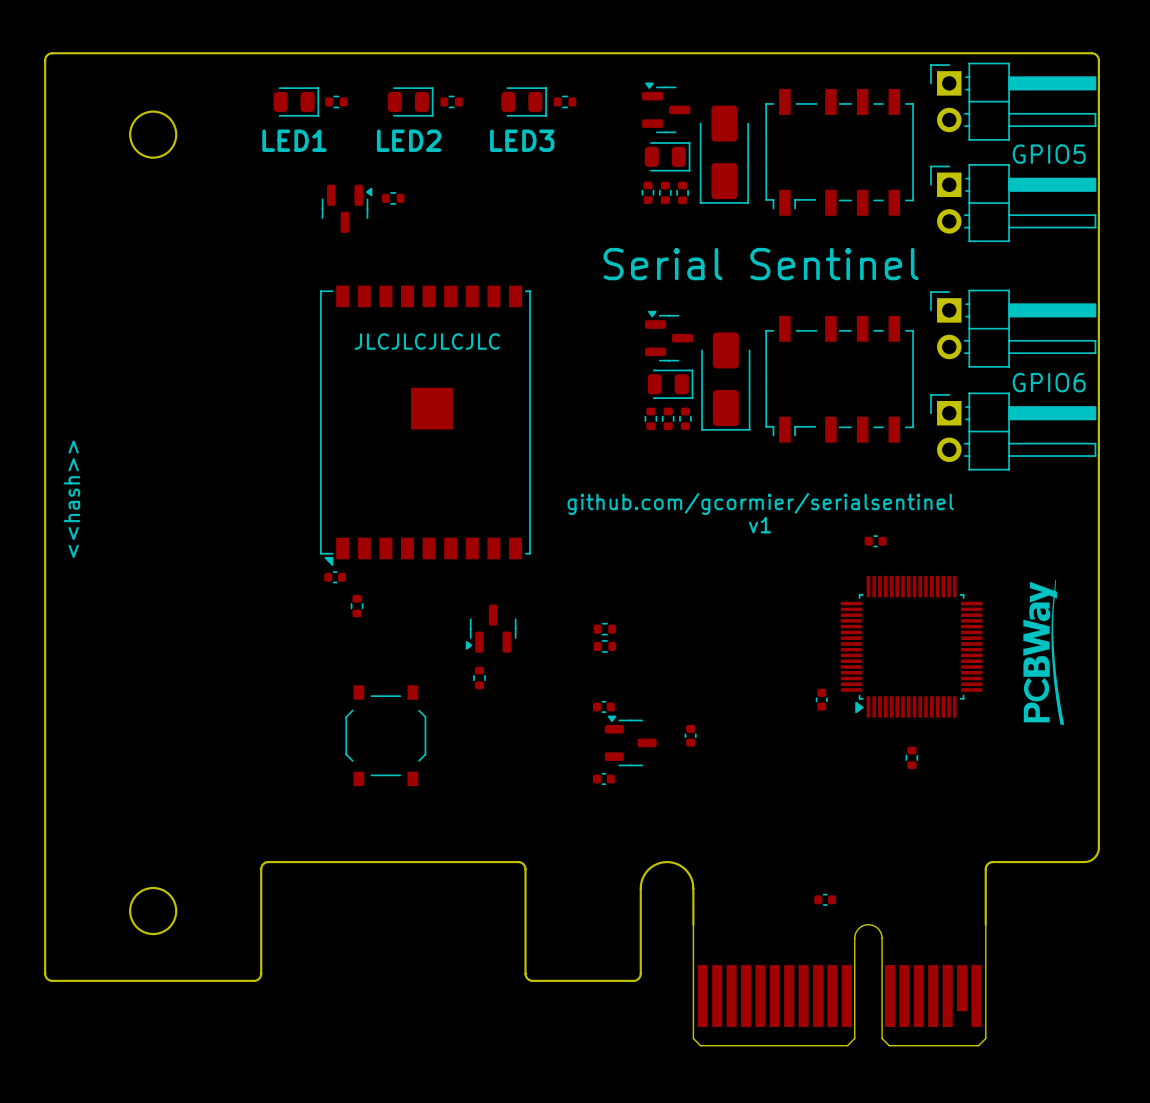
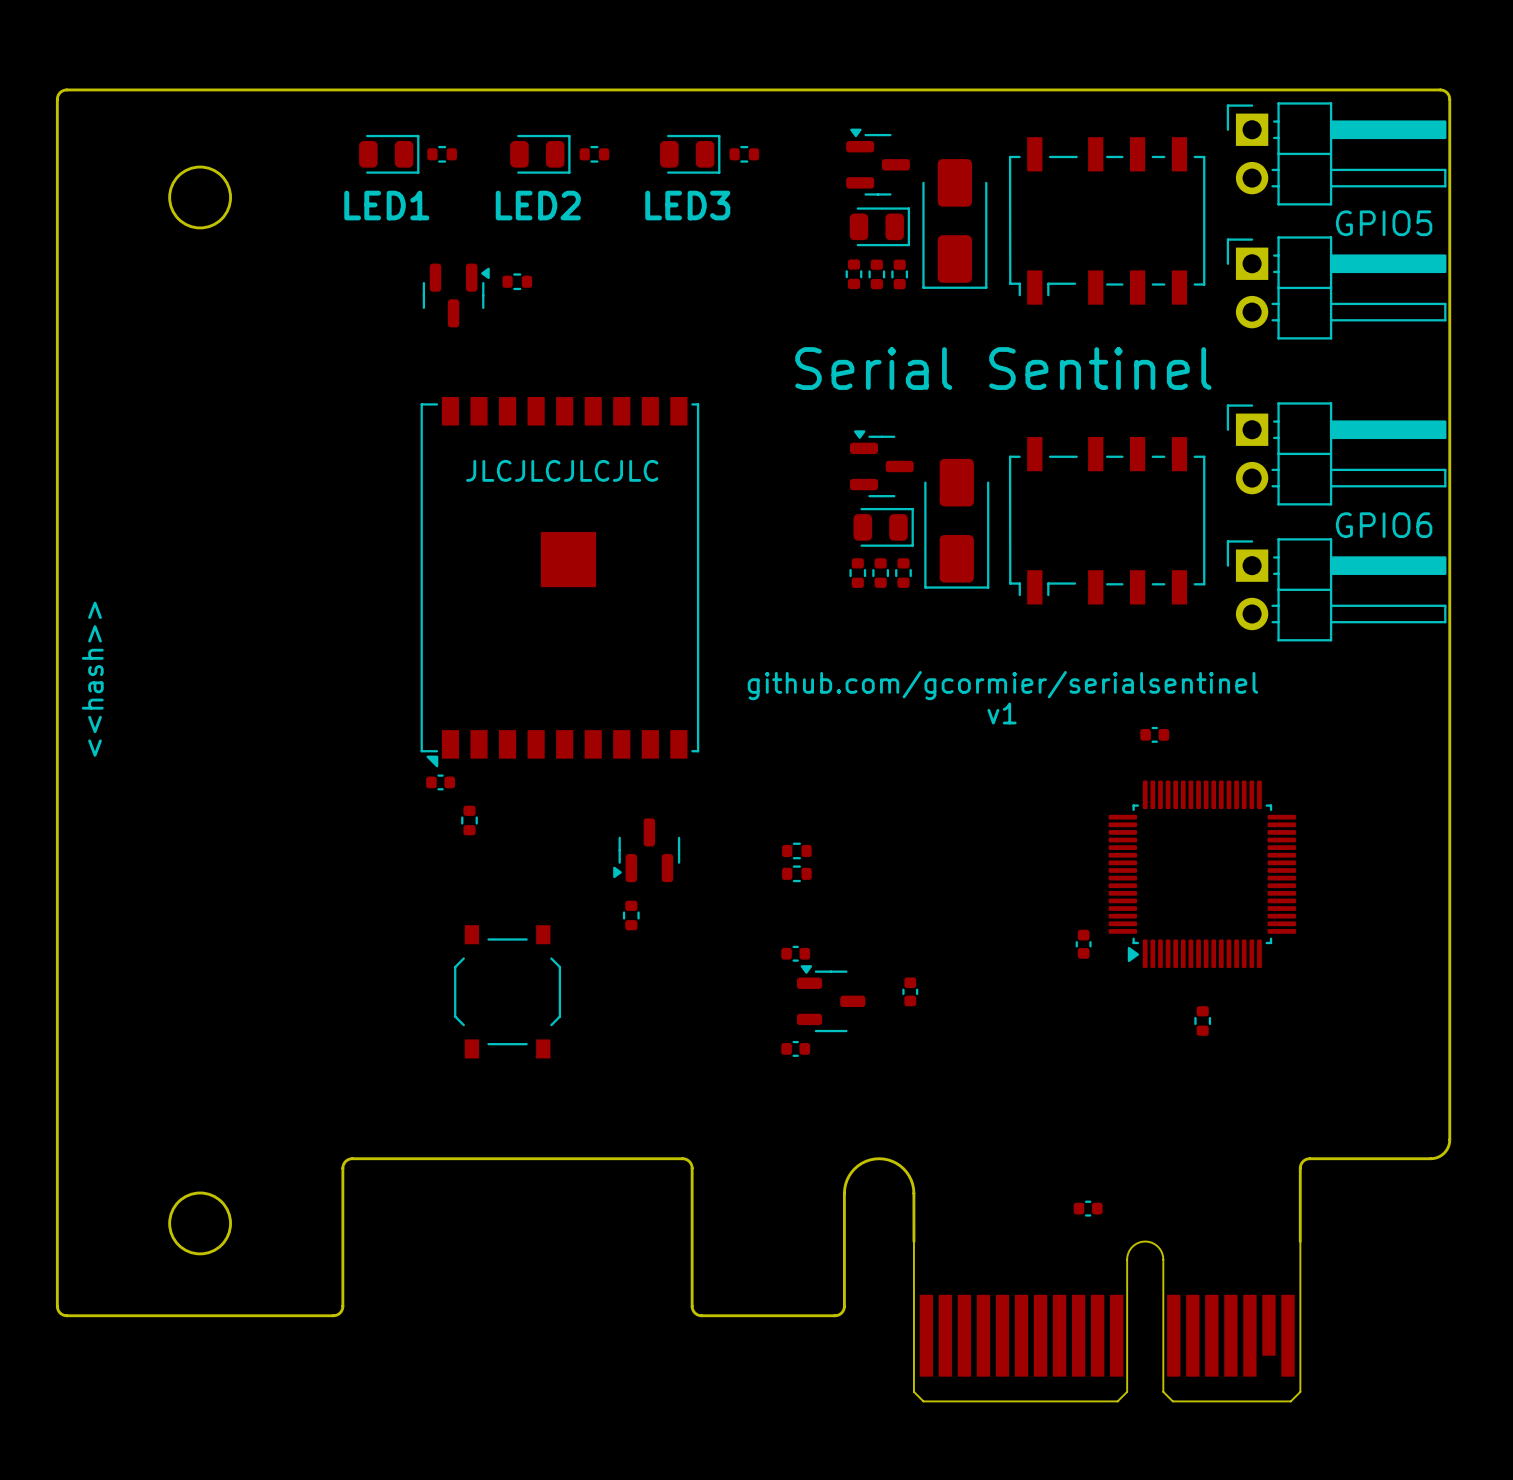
drawing: [1023, 579, 1065, 726] -> none

